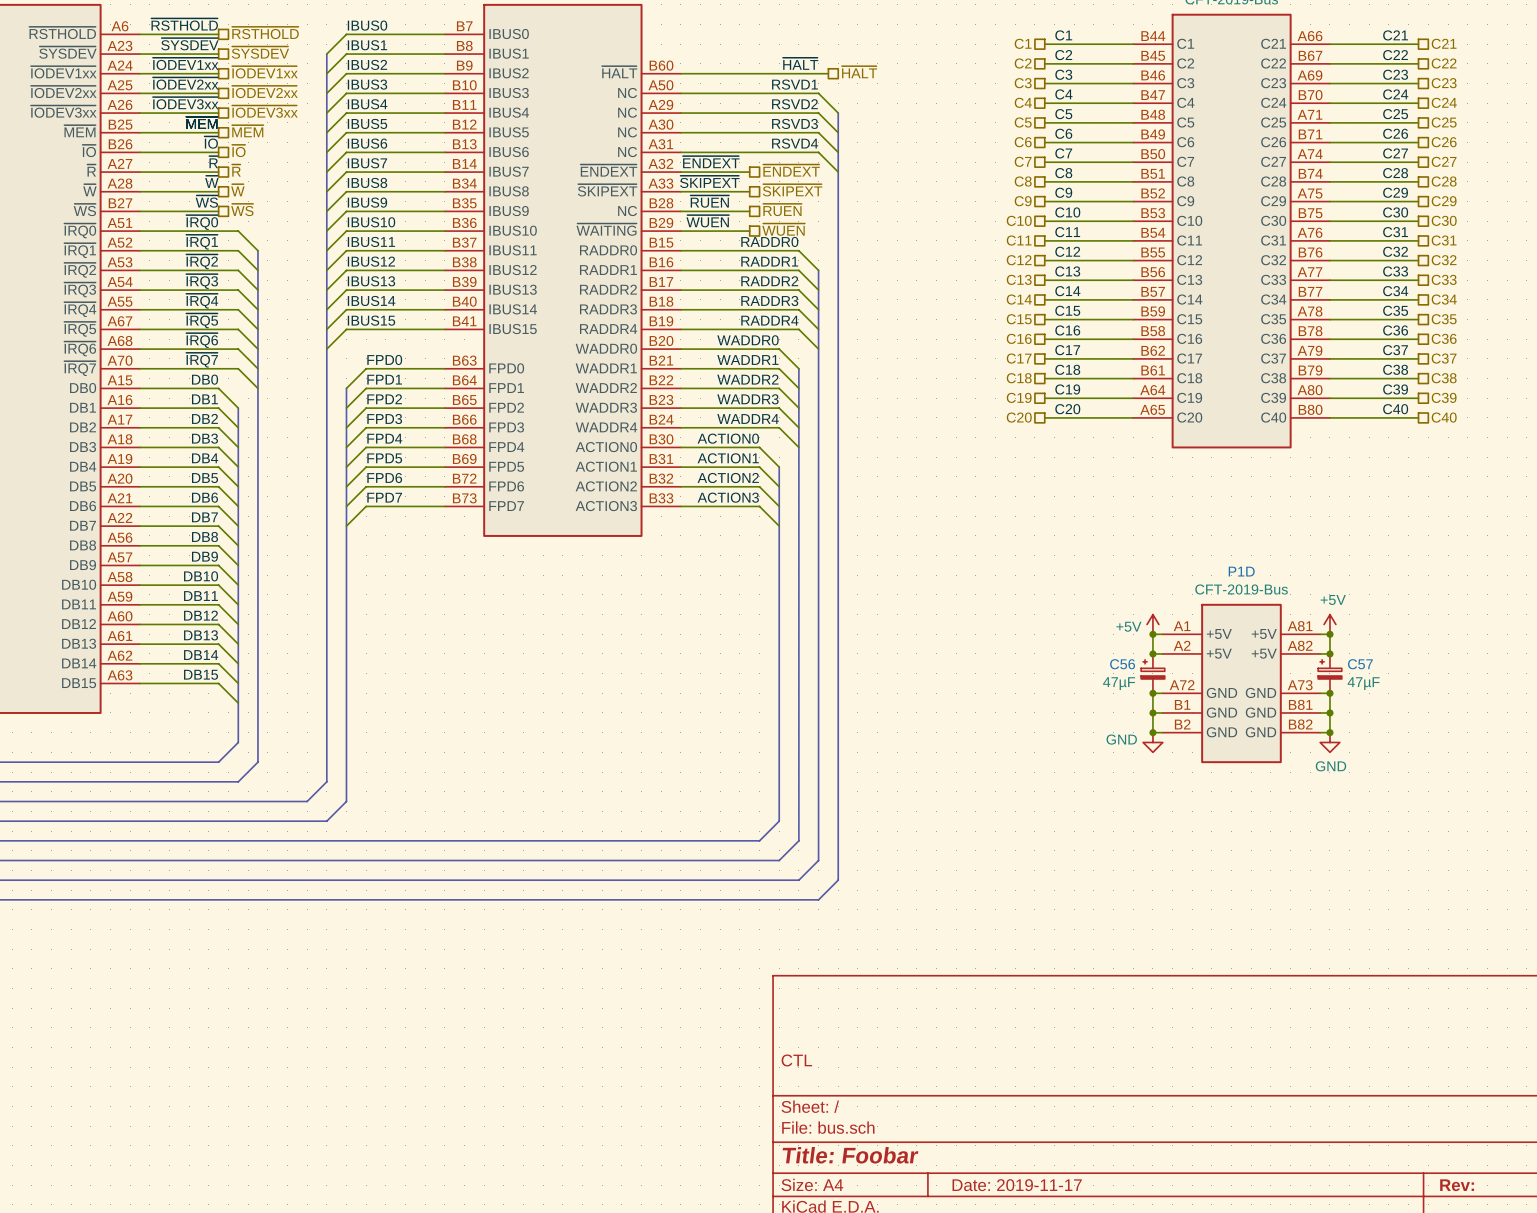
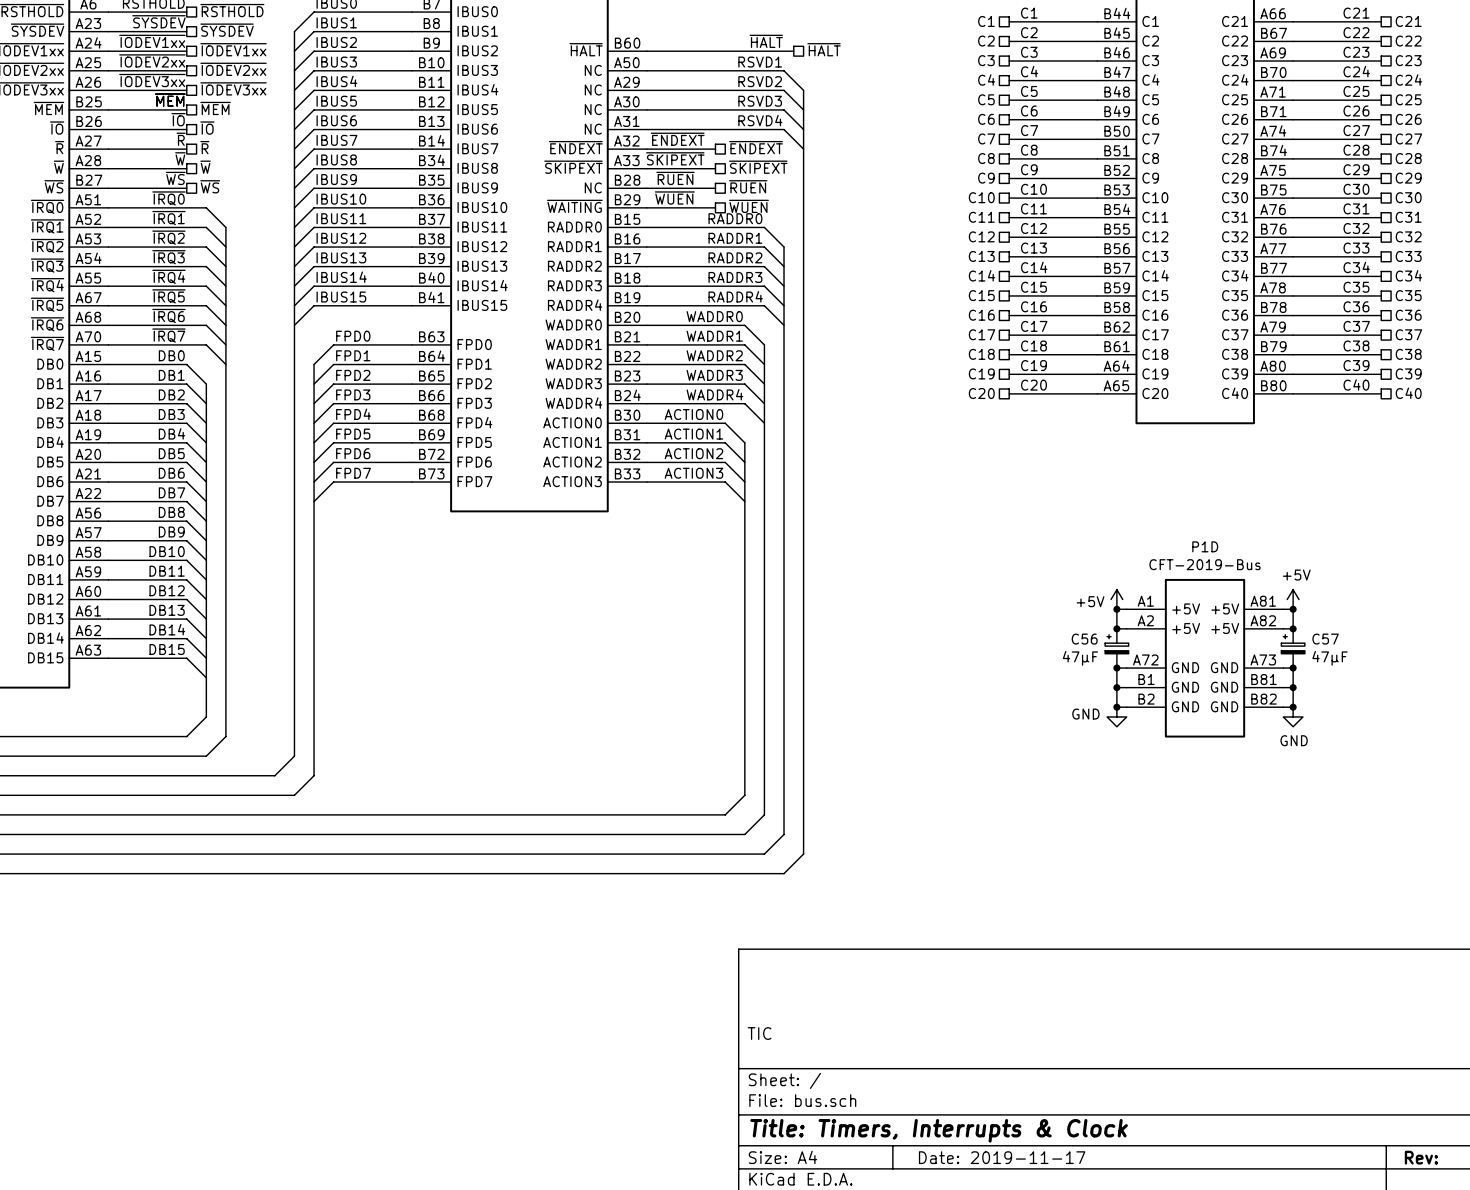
title block: CTL (796, 1060) -> TIC (759, 1033)
title block: Title: Foobar (850, 1155) -> Title: Timers, Interrupts & Clock (939, 1130)

